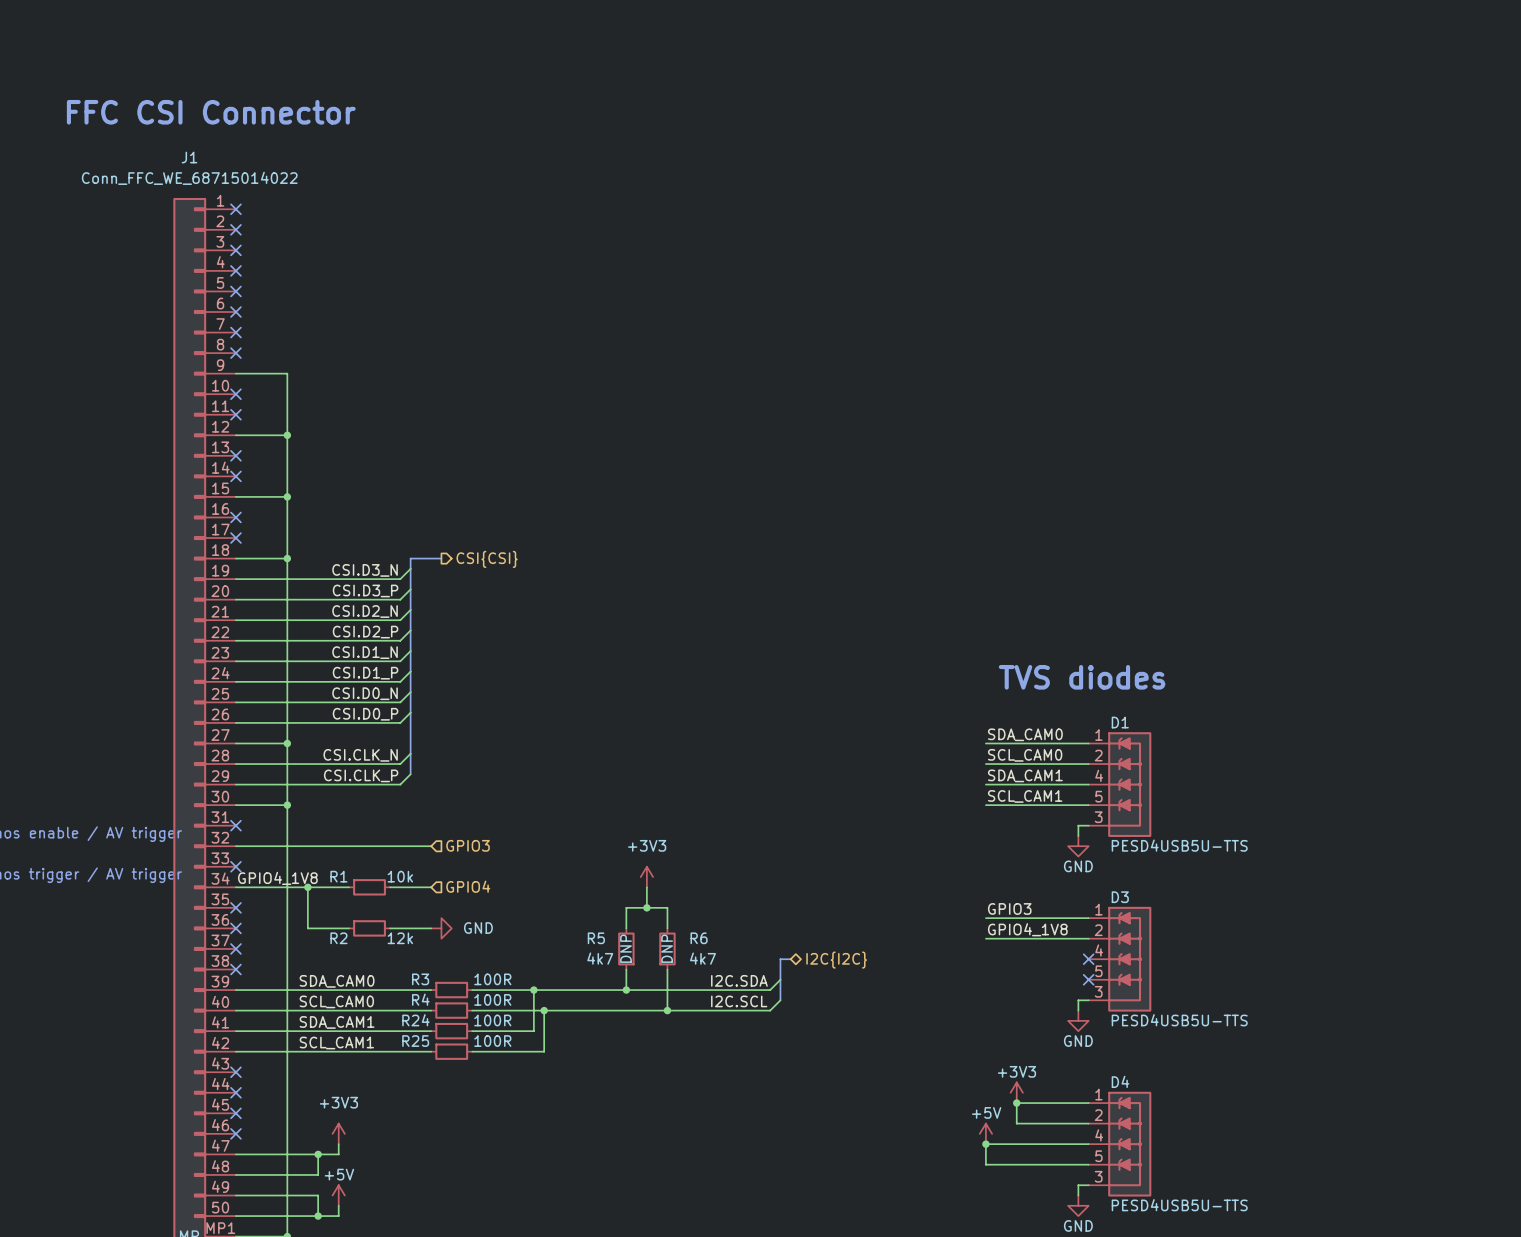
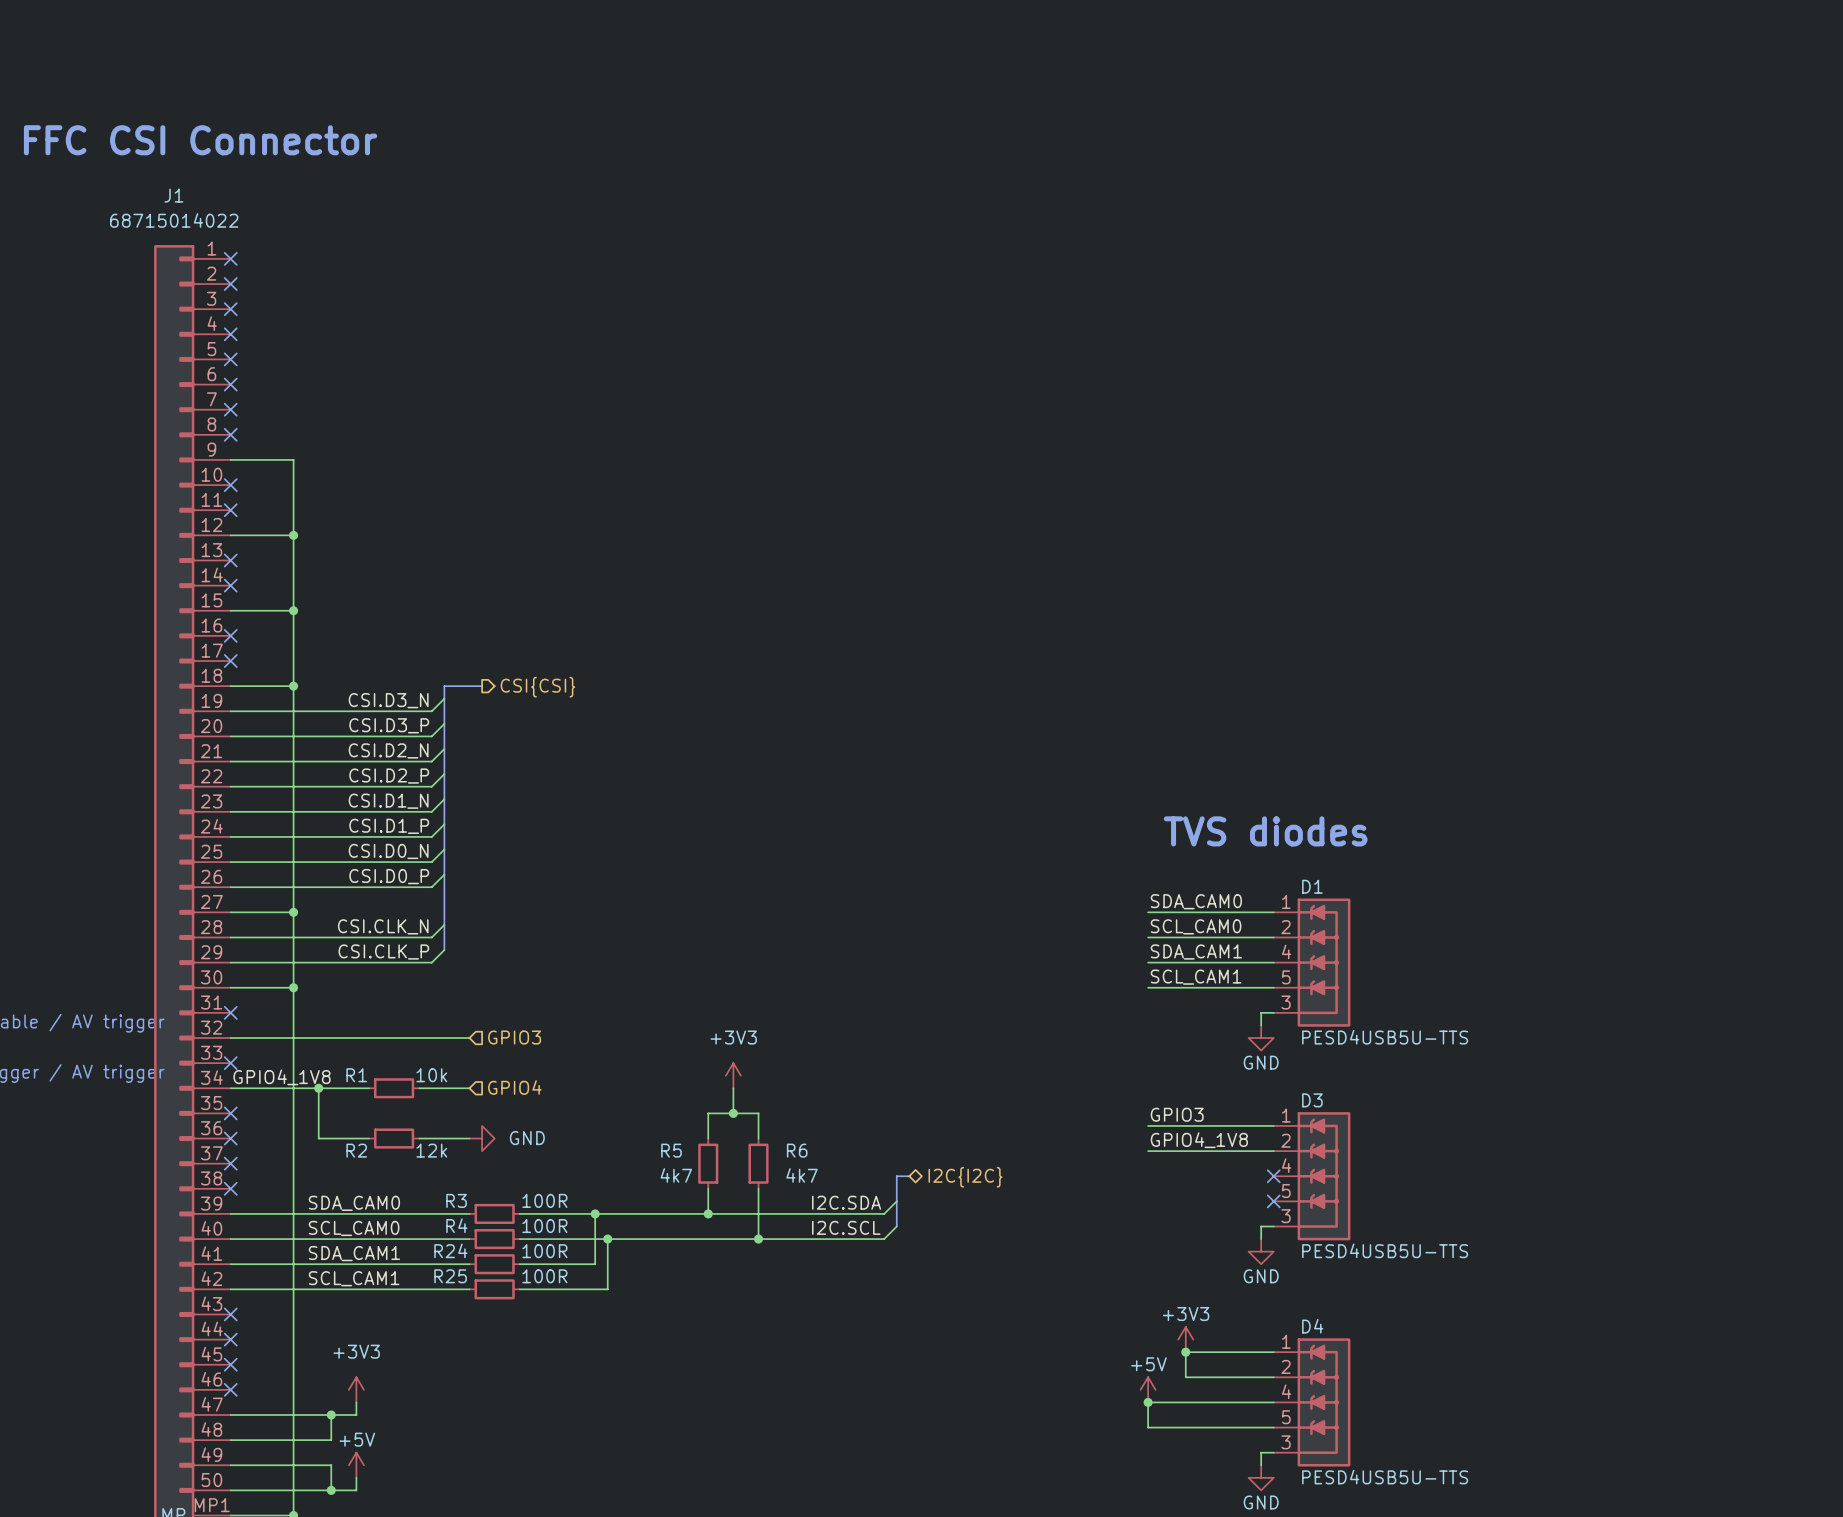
J1 text: none -> 68715014022 (174, 220)
J1 value: Conn_FFC_WE_68715014022 (189, 178) -> none
R5 text: DNP (625, 948) -> none
R6 text: DNP (667, 948) -> none

